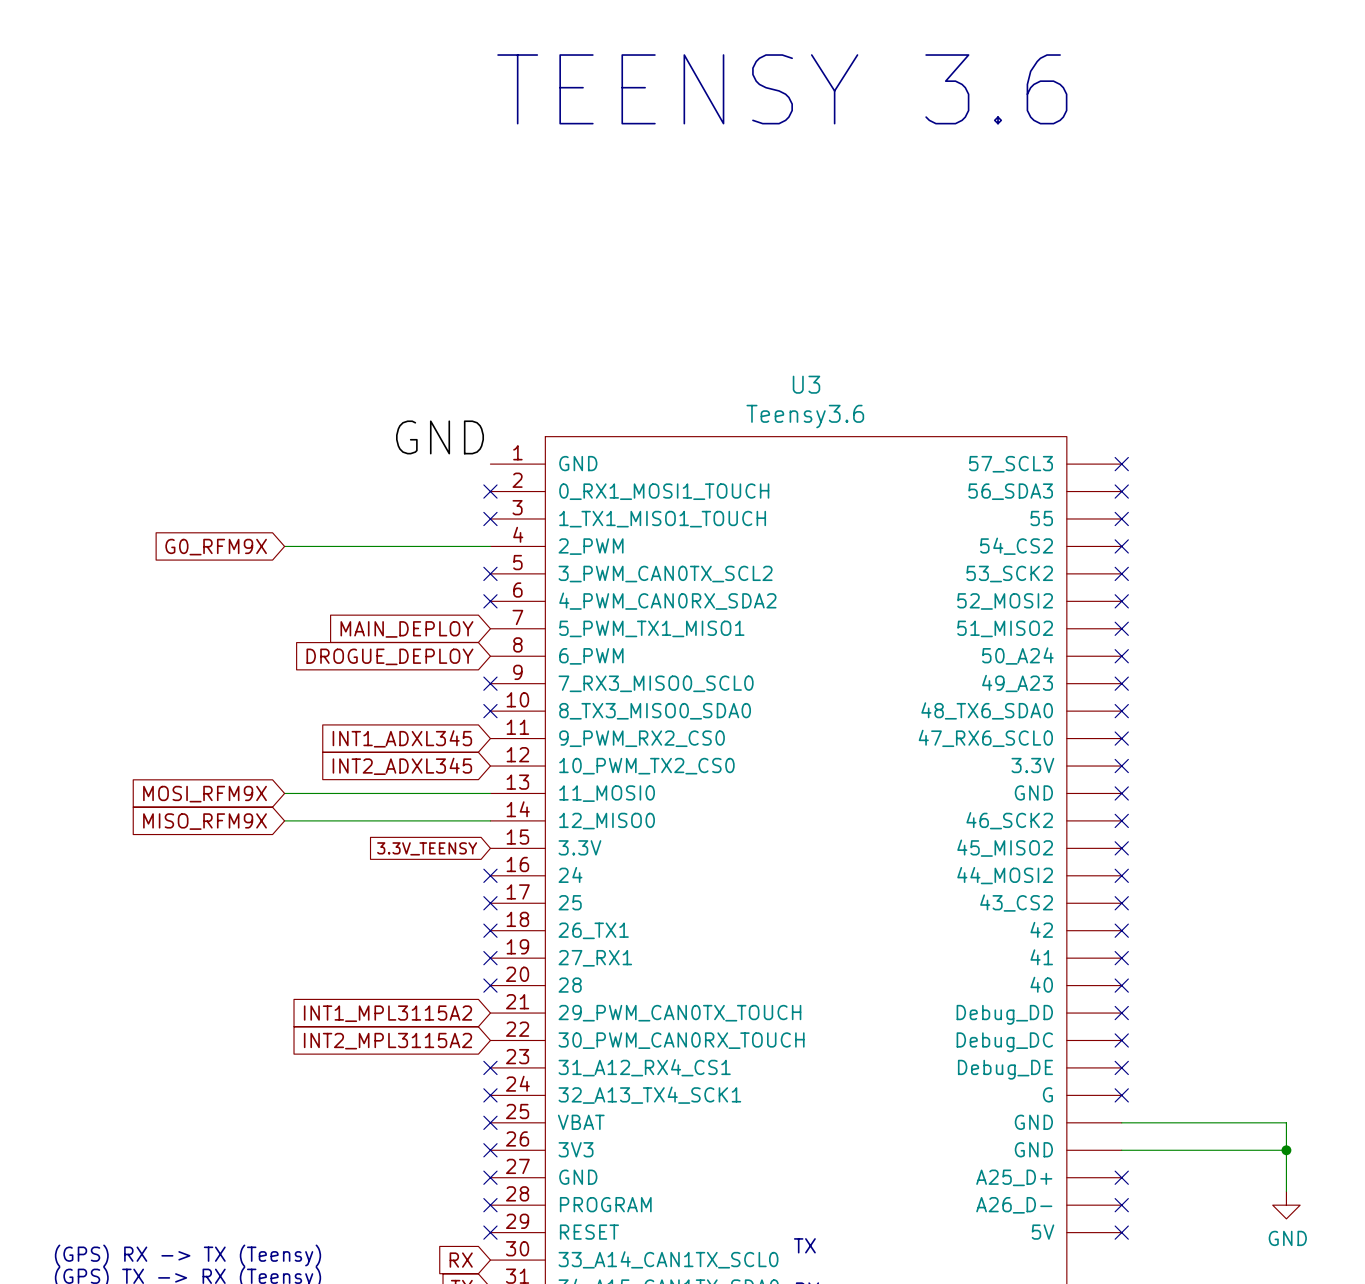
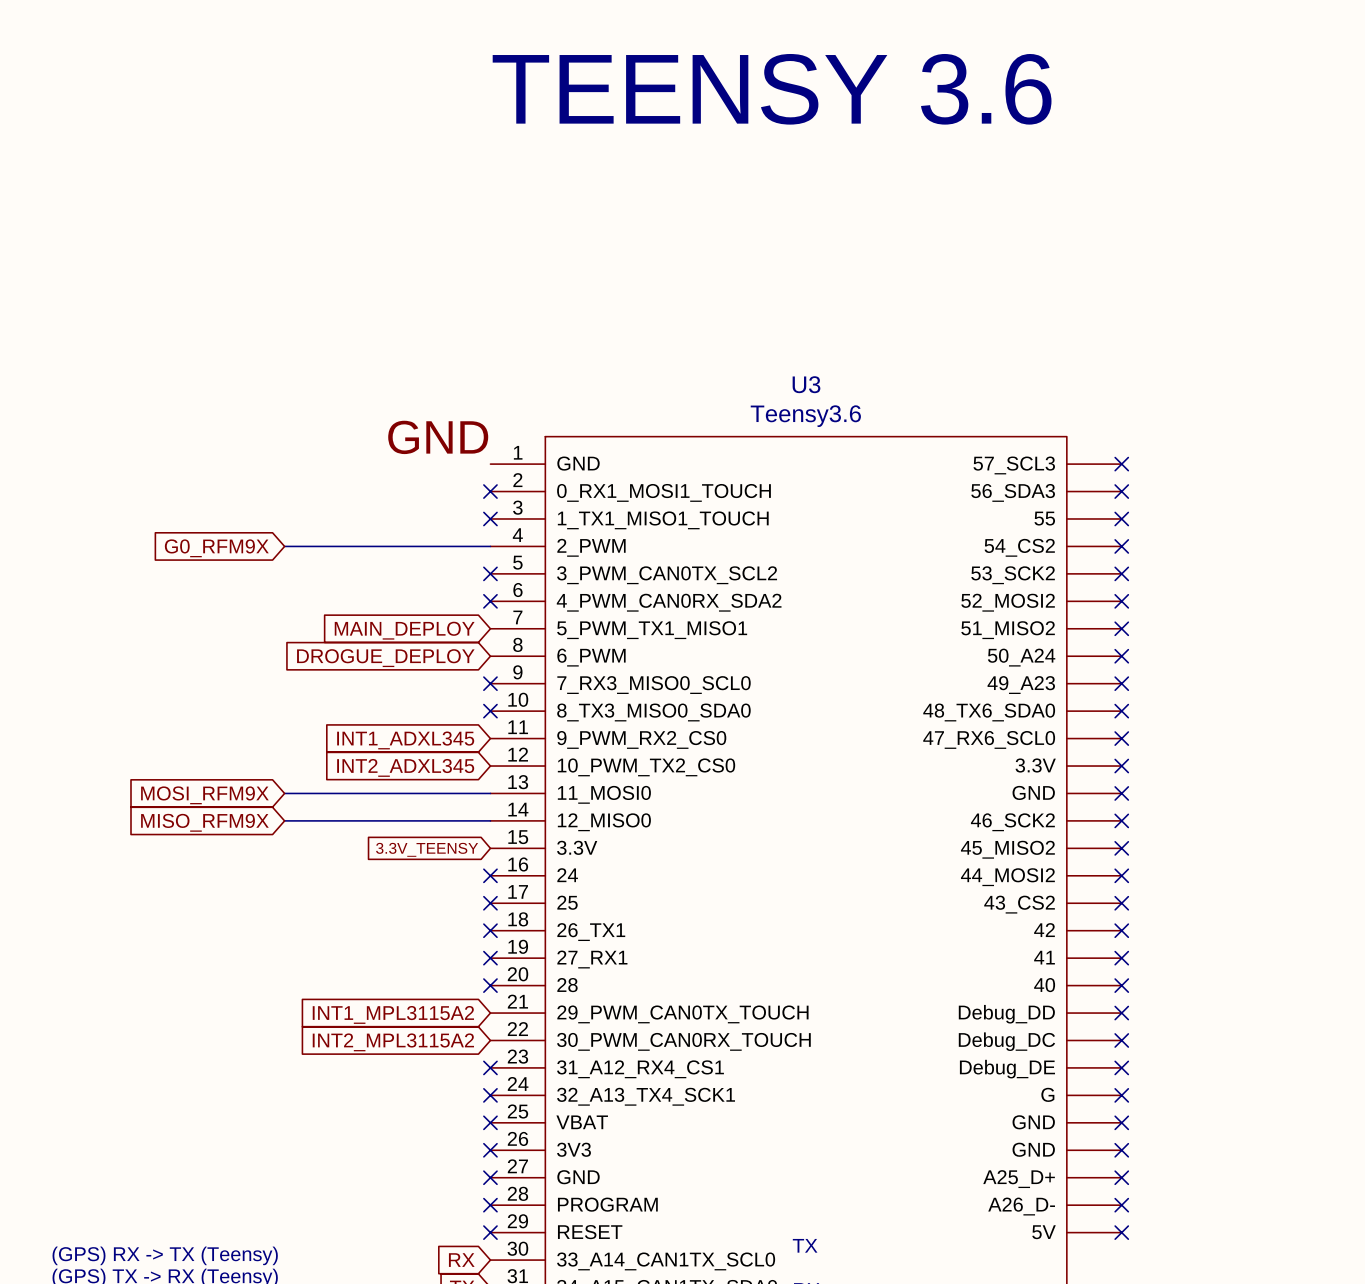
wire: (1121, 1122) (1286, 1122) (1286, 1191) -> none
no-connect mark: none -> (1121, 1122)
wire: (1121, 1150) (1286, 1150) -> none
no-connect mark: none -> (1121, 1150)
junction: (1286, 1150) -> none
power symbol: GND (1286, 1205) -> none

